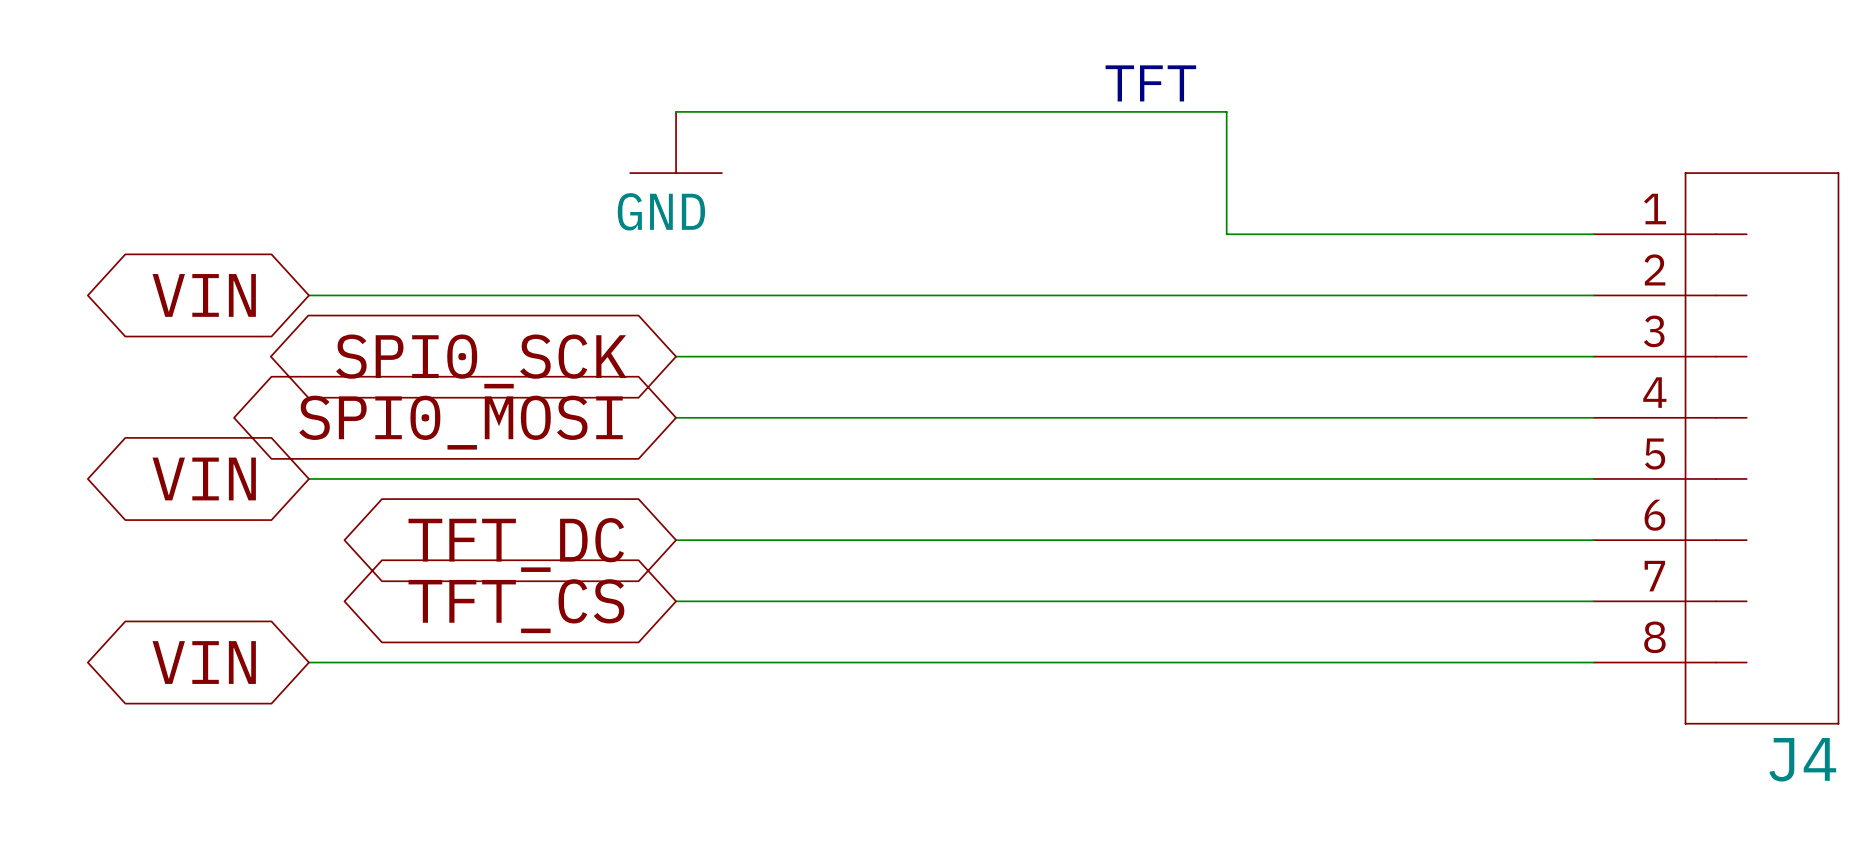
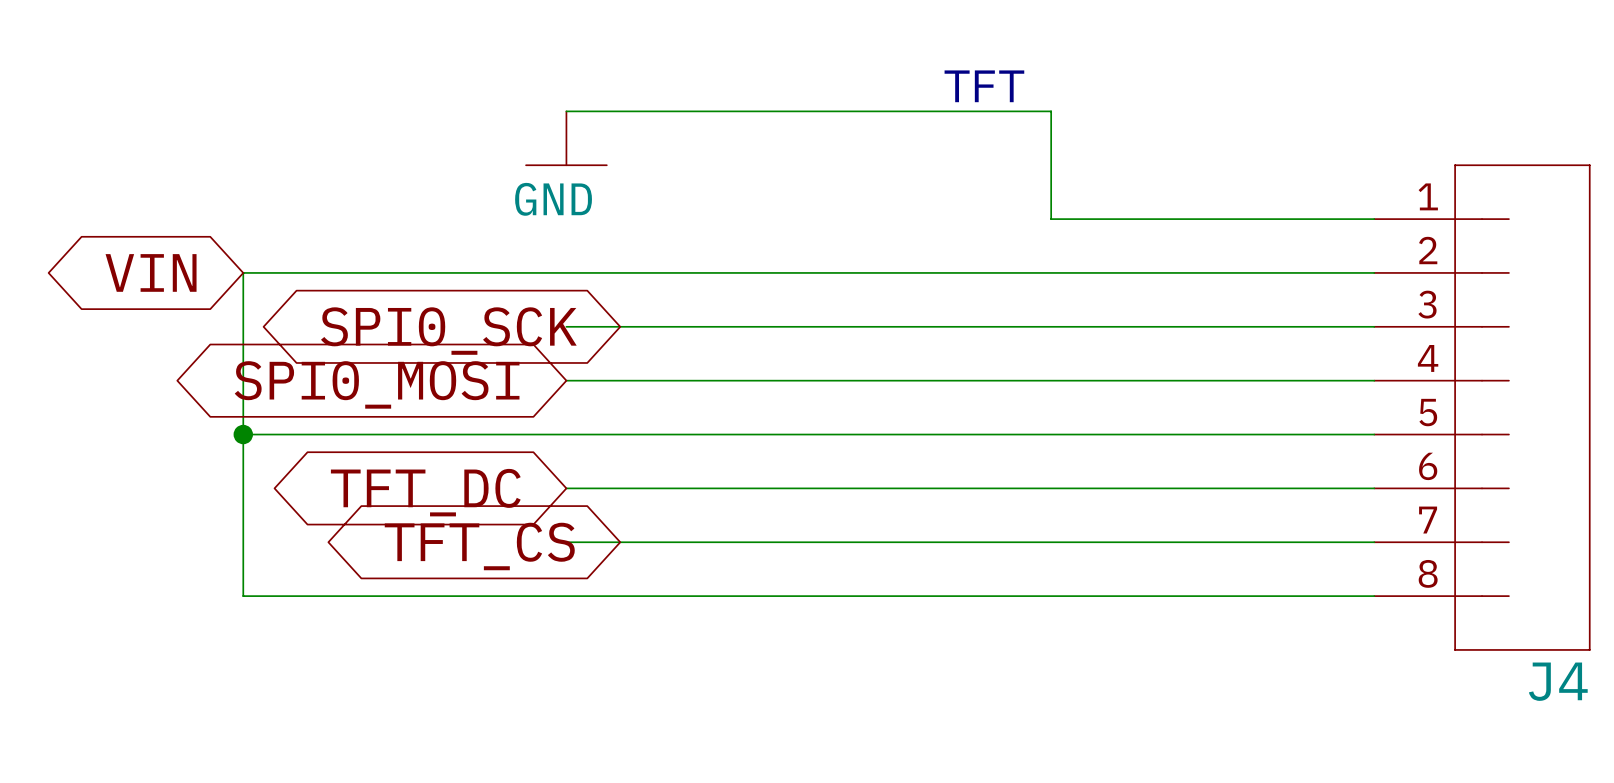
wire: none -> (243, 272) (243, 596)
global label position: SPI0_SCK (481, 361) -> SPI0_SCK (448, 331)
global label: VIN (204, 478) -> none
junction: none -> (243, 434)
global label position: TFT_CS (516, 606) -> TFT_CS (479, 546)
global label: VIN (204, 662) -> none

